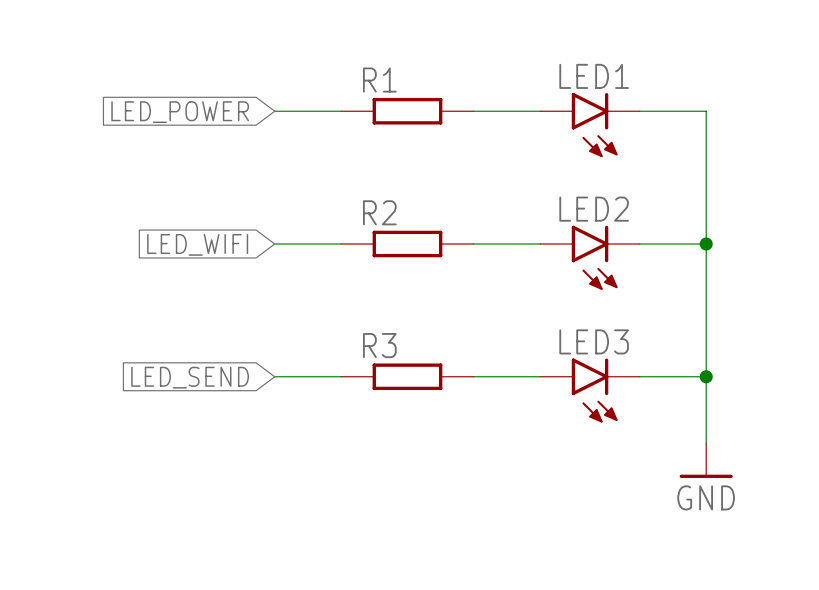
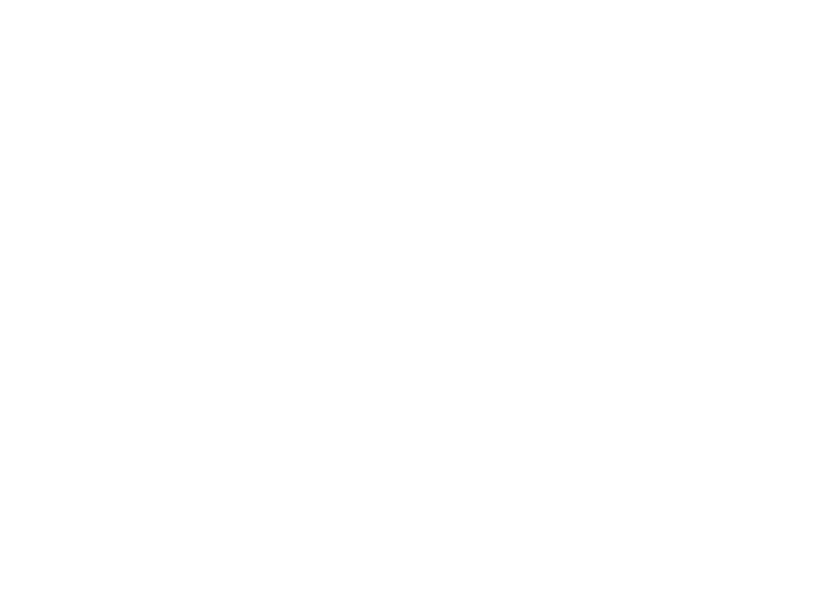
wire: (274, 111) (341, 111) -> none
R1: (407, 111) -> none
wire: (473, 111) (540, 111) -> none
wire: (639, 111) (706, 111) (706, 443) -> none
global label: LED_POWER (180, 112) -> none
LED1: (590, 125) -> none
global label: LED_WIFI (197, 244) -> none
wire: (274, 244) (341, 244) -> none
R2: (407, 244) -> none
wire: (473, 244) (540, 244) -> none
wire: (639, 244) (706, 244) -> none
junction: (706, 244) -> none
LED2: (590, 257) -> none
wire: (274, 376) (341, 376) -> none
R3: (407, 376) -> none
wire: (473, 376) (540, 376) -> none
wire: (639, 376) (706, 376) -> none
junction: (706, 376) -> none
global label: LED_SEND (190, 377) -> none
LED3: (590, 390) -> none
power symbol: GND (706, 460) -> none

